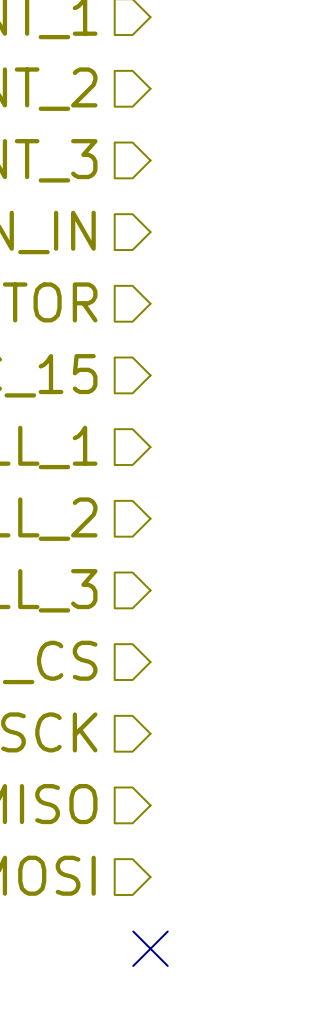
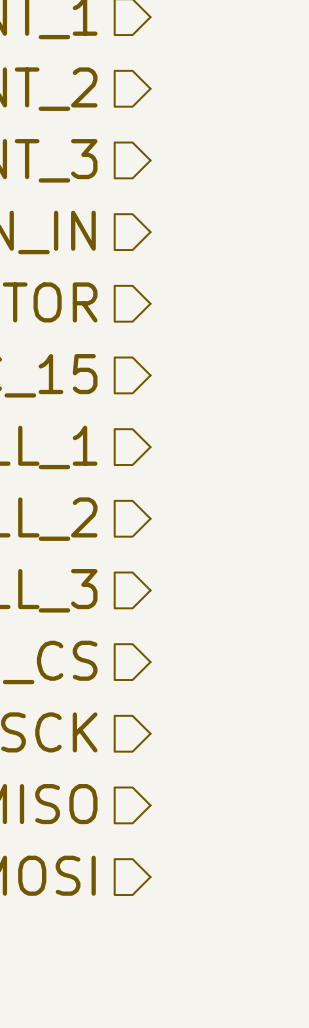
no-connect mark: (150, 948) -> none

